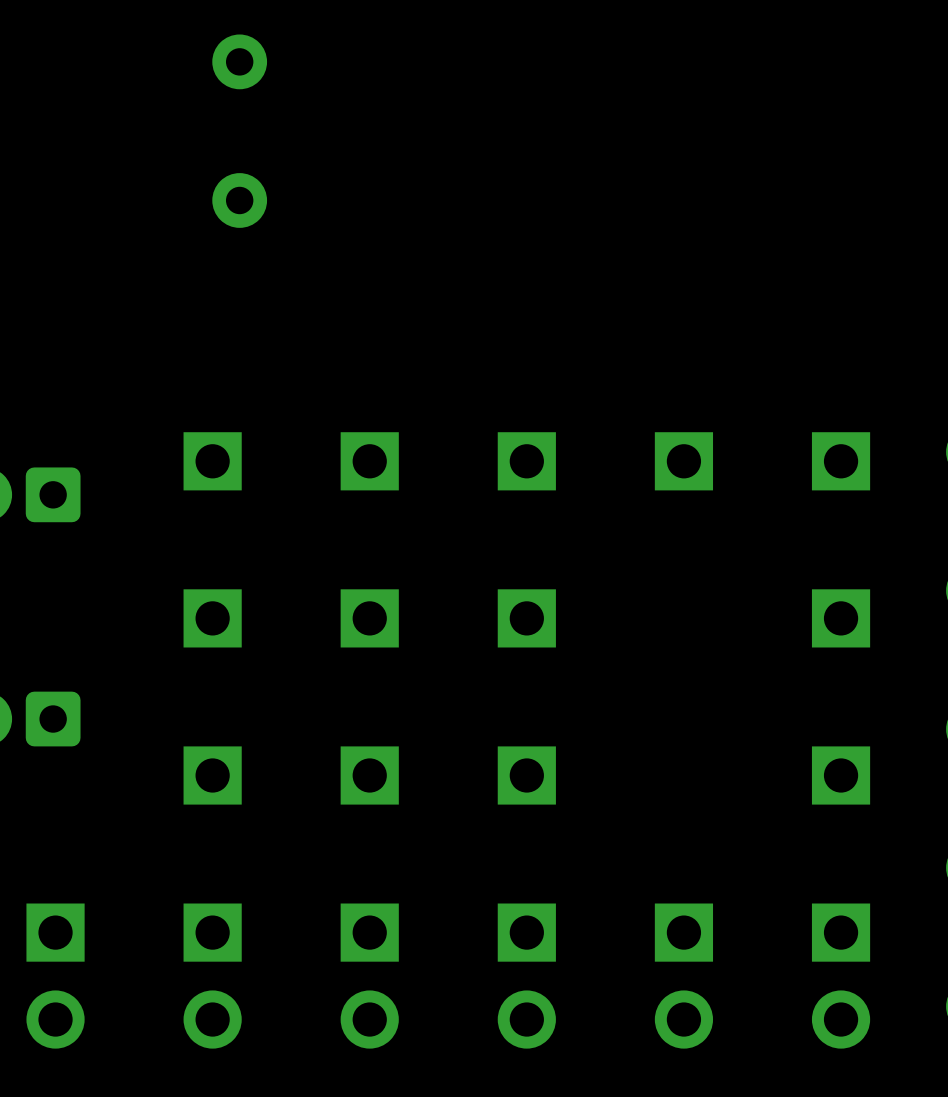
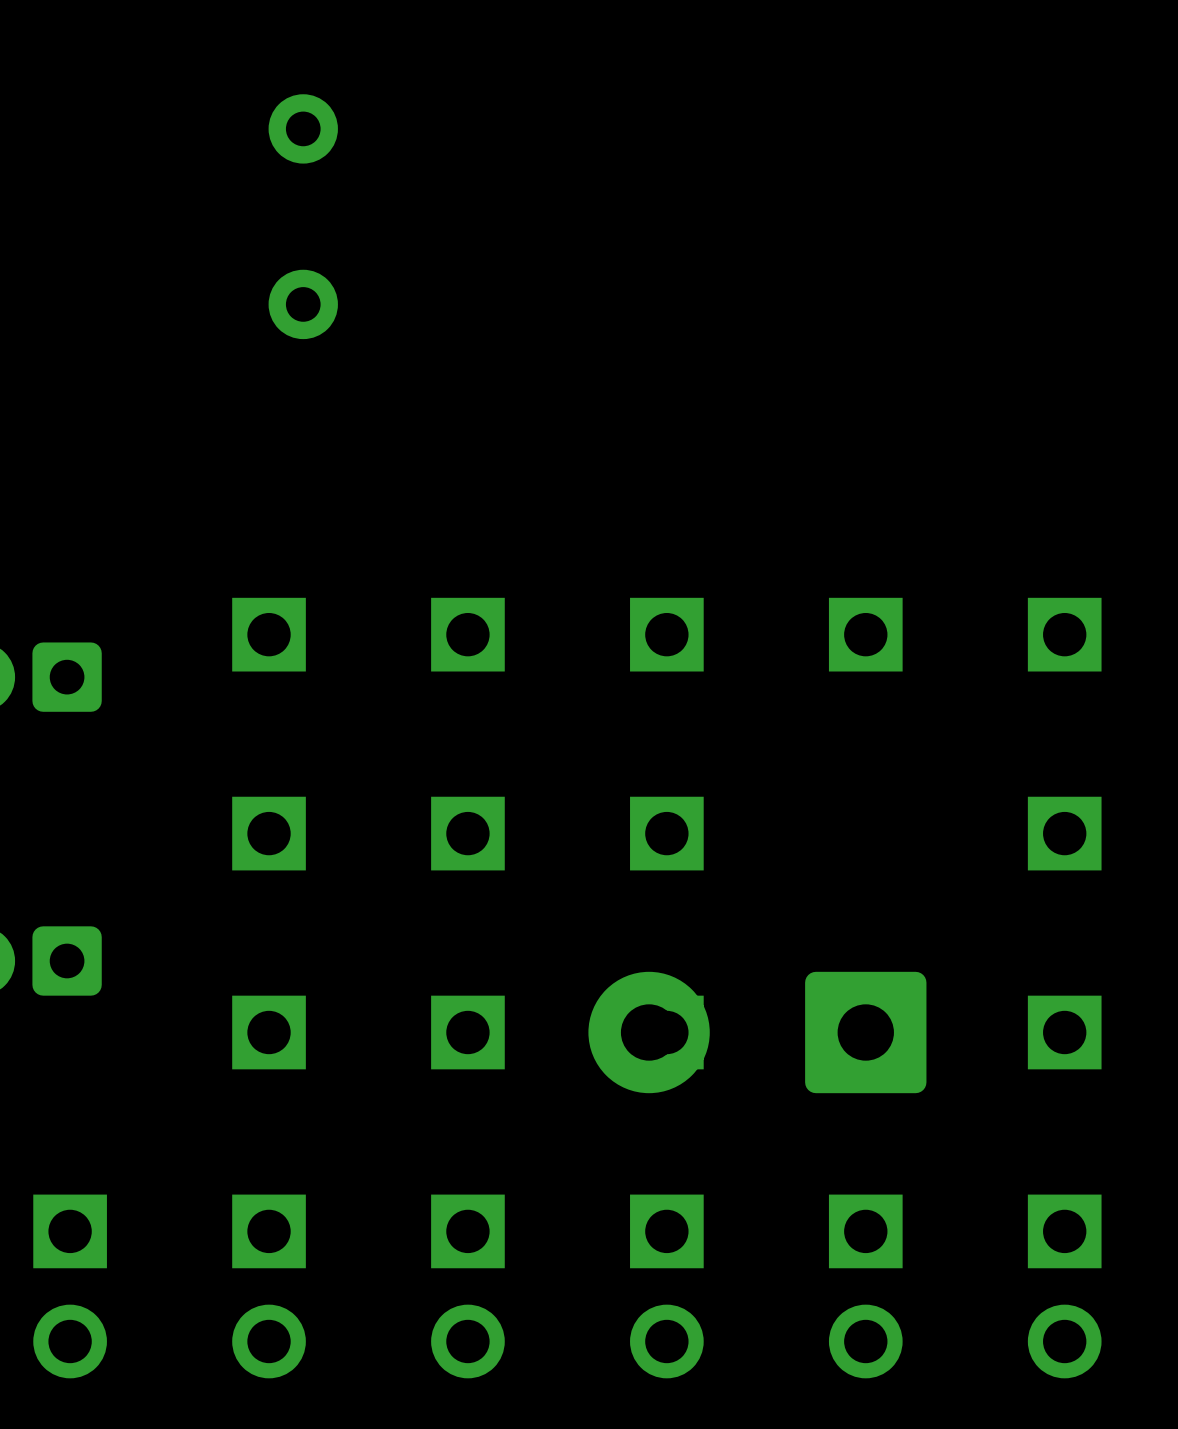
part: none -> (757, 1032)

